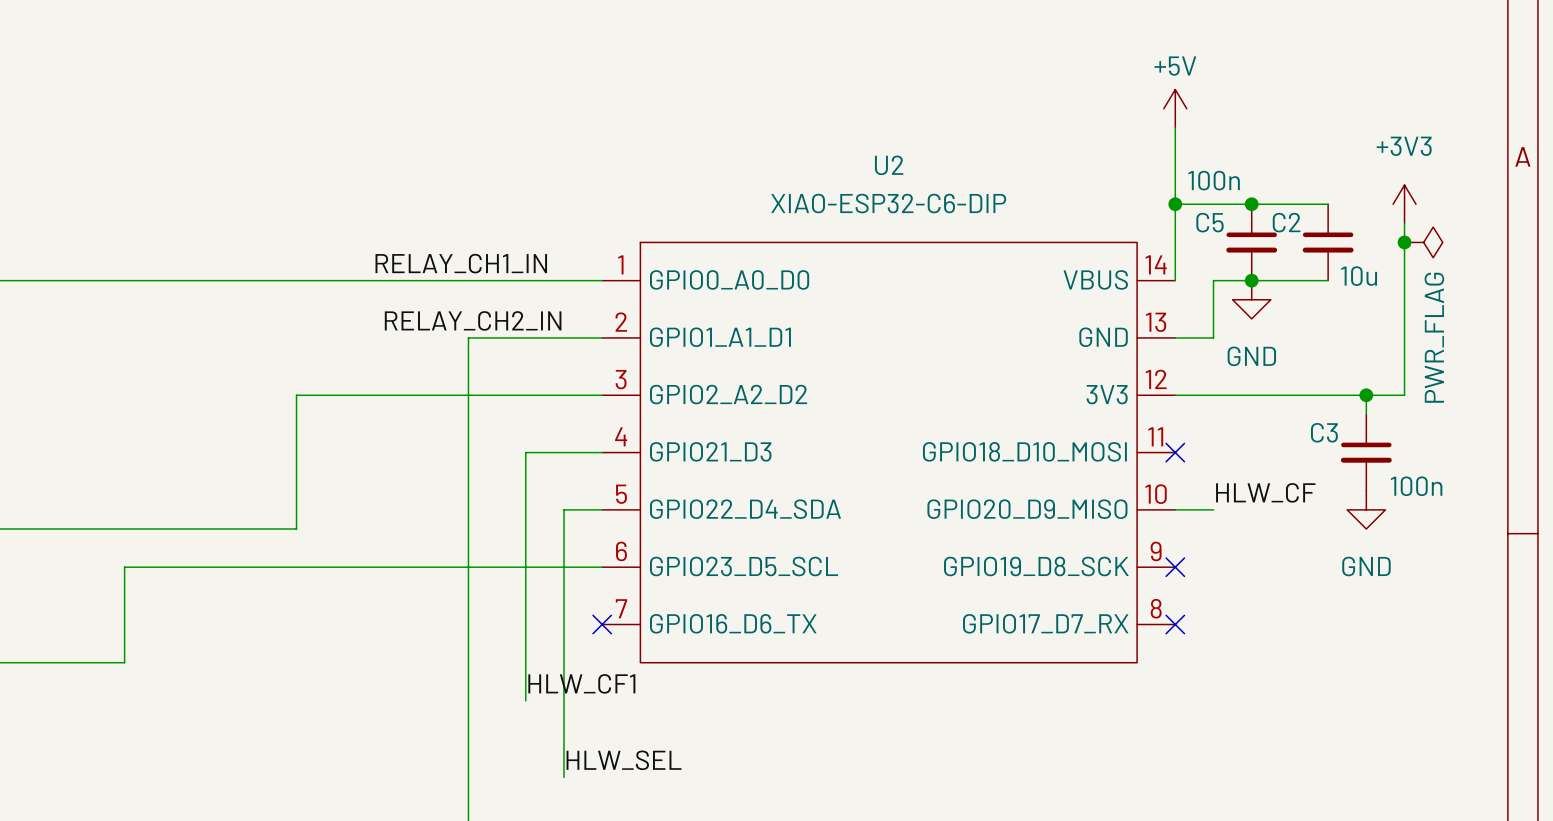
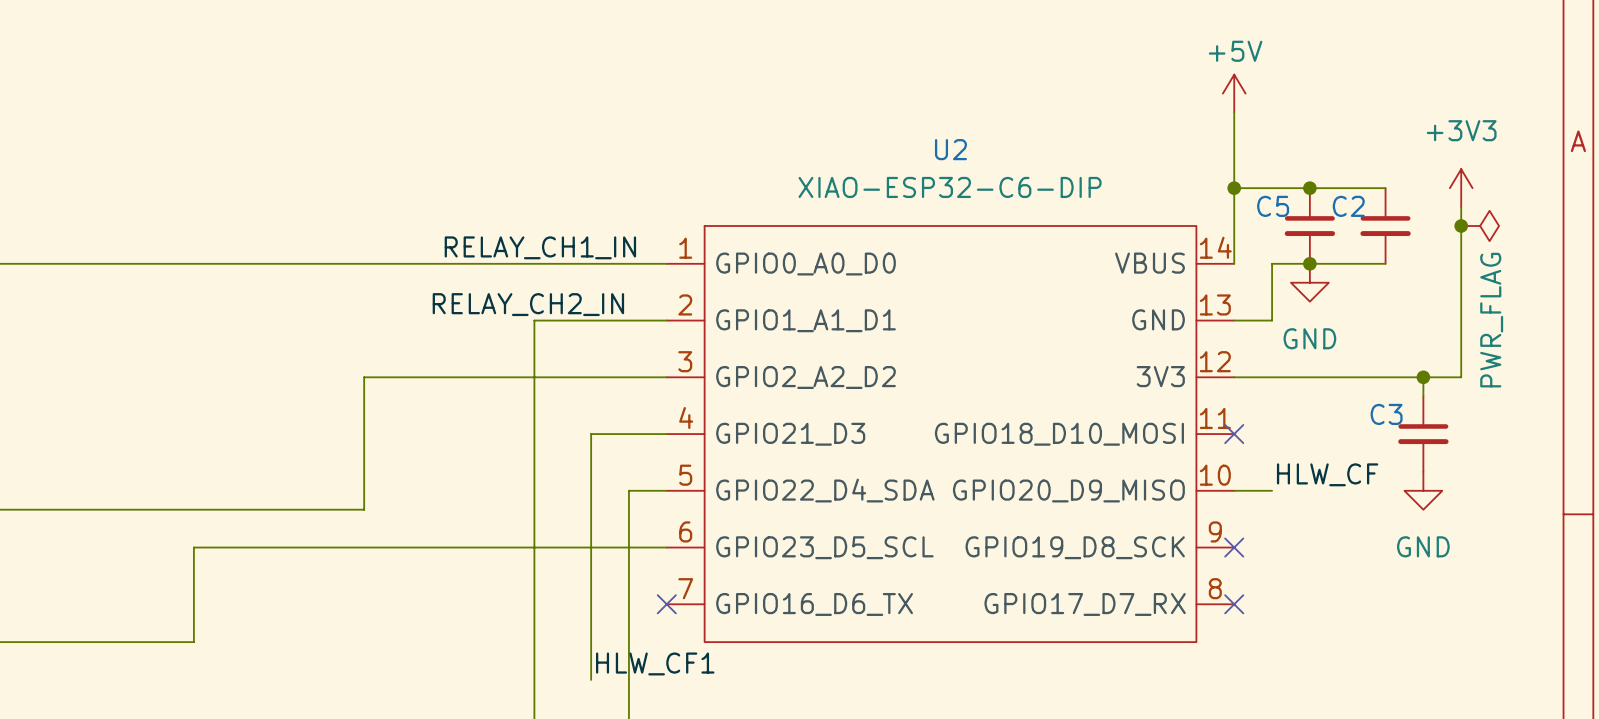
C5 value: 100n (1214, 180) -> none
C2 value: 10u (1359, 276) -> none
C3 value: 100n (1416, 486) -> none

